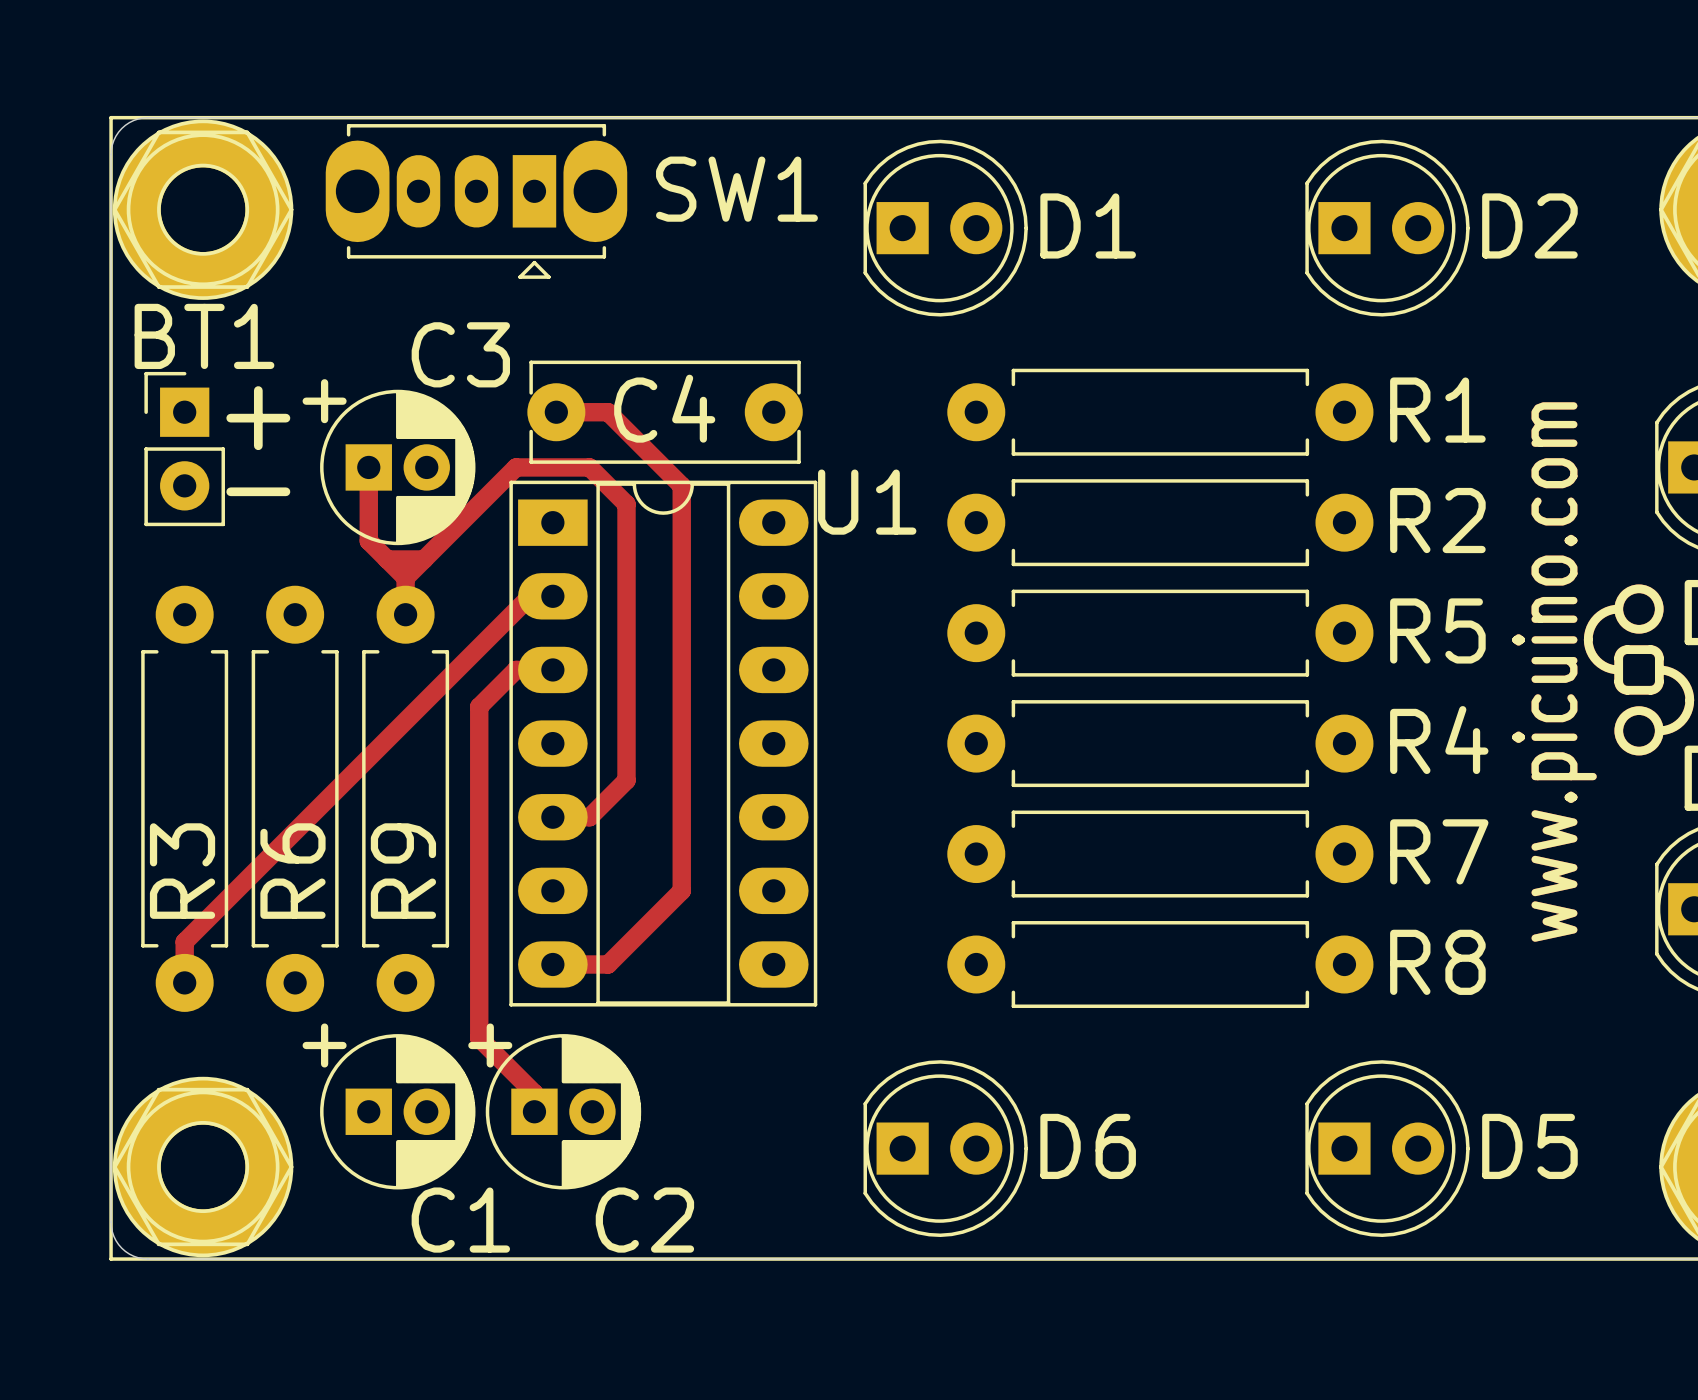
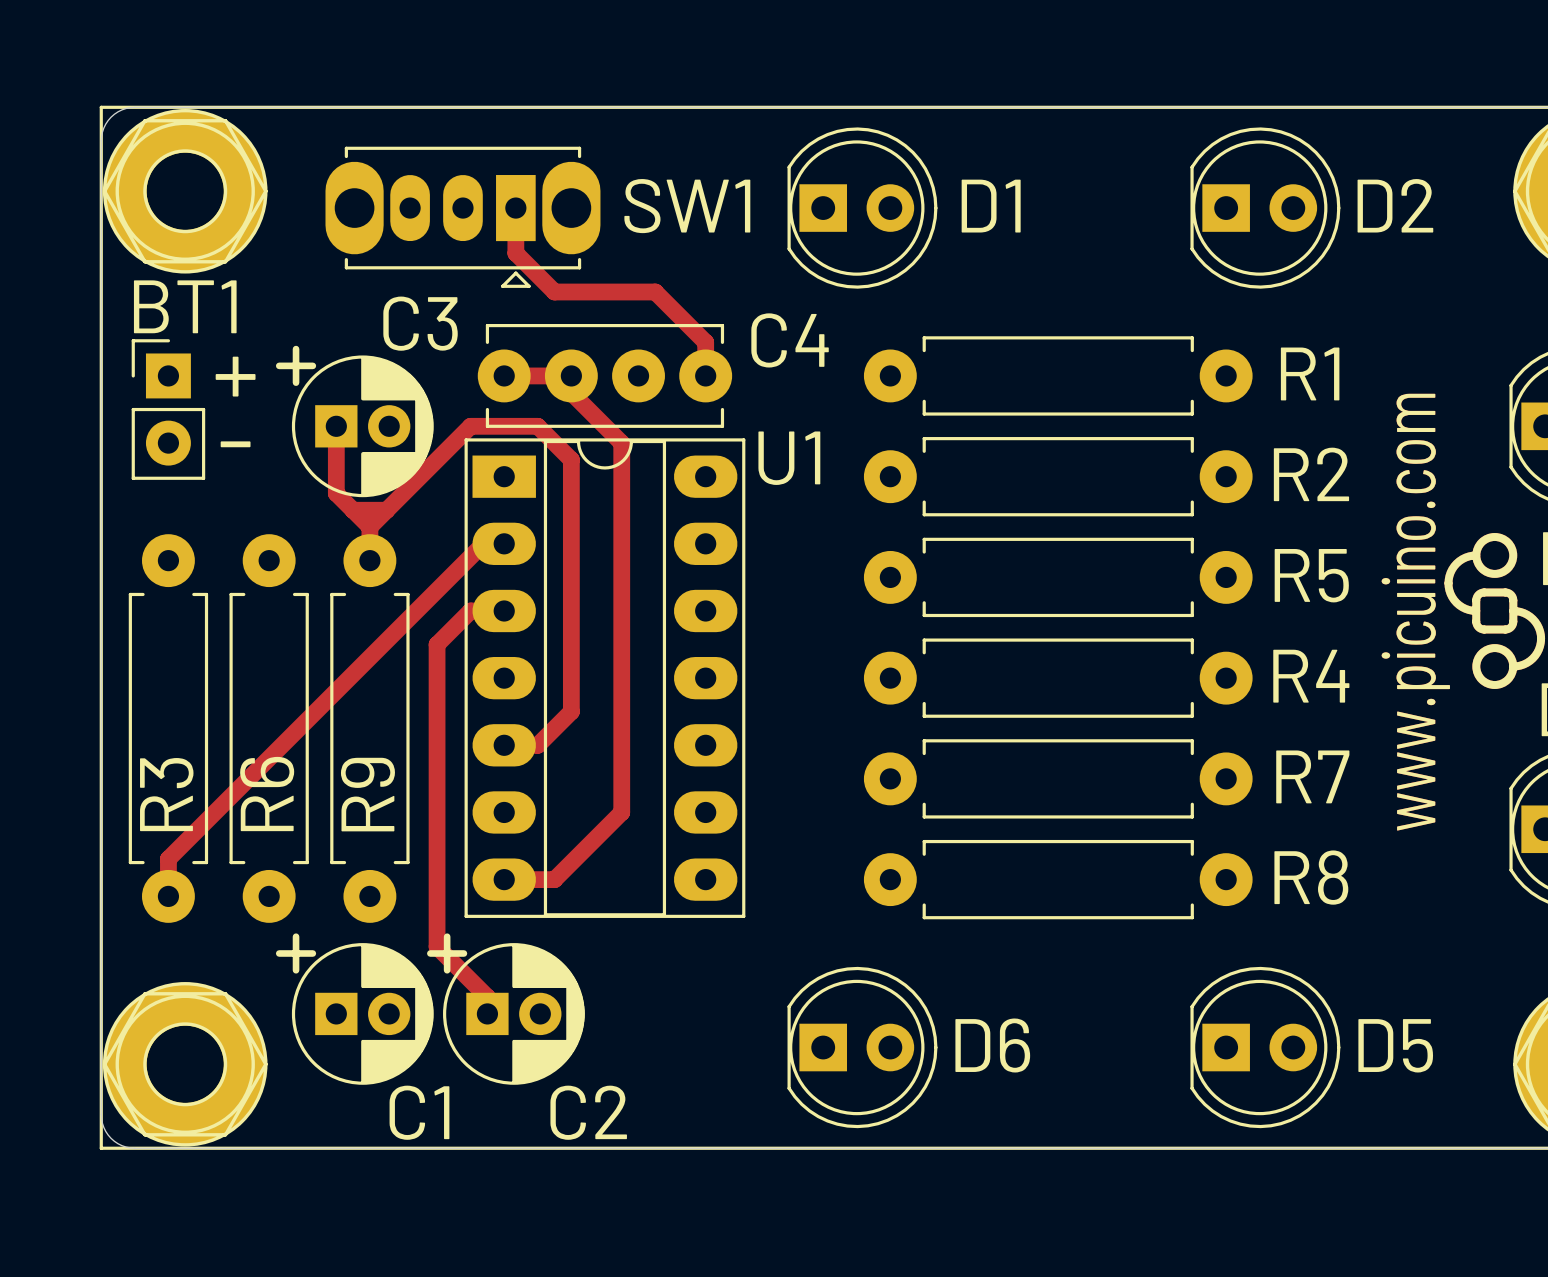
SW1 name position: SW1 (736, 189) -> SW1 (687, 206)
SW1 position: (476, 201) -> (462, 217)
track: none -> (515, 208) (515, 253) (554, 292) (655, 292) (705, 342) (705, 375)
C4 footprint: [527, 360, 803, 464] -> [477, 323, 733, 428]
C4 name position: C4 (664, 408) -> C4 (790, 340)

